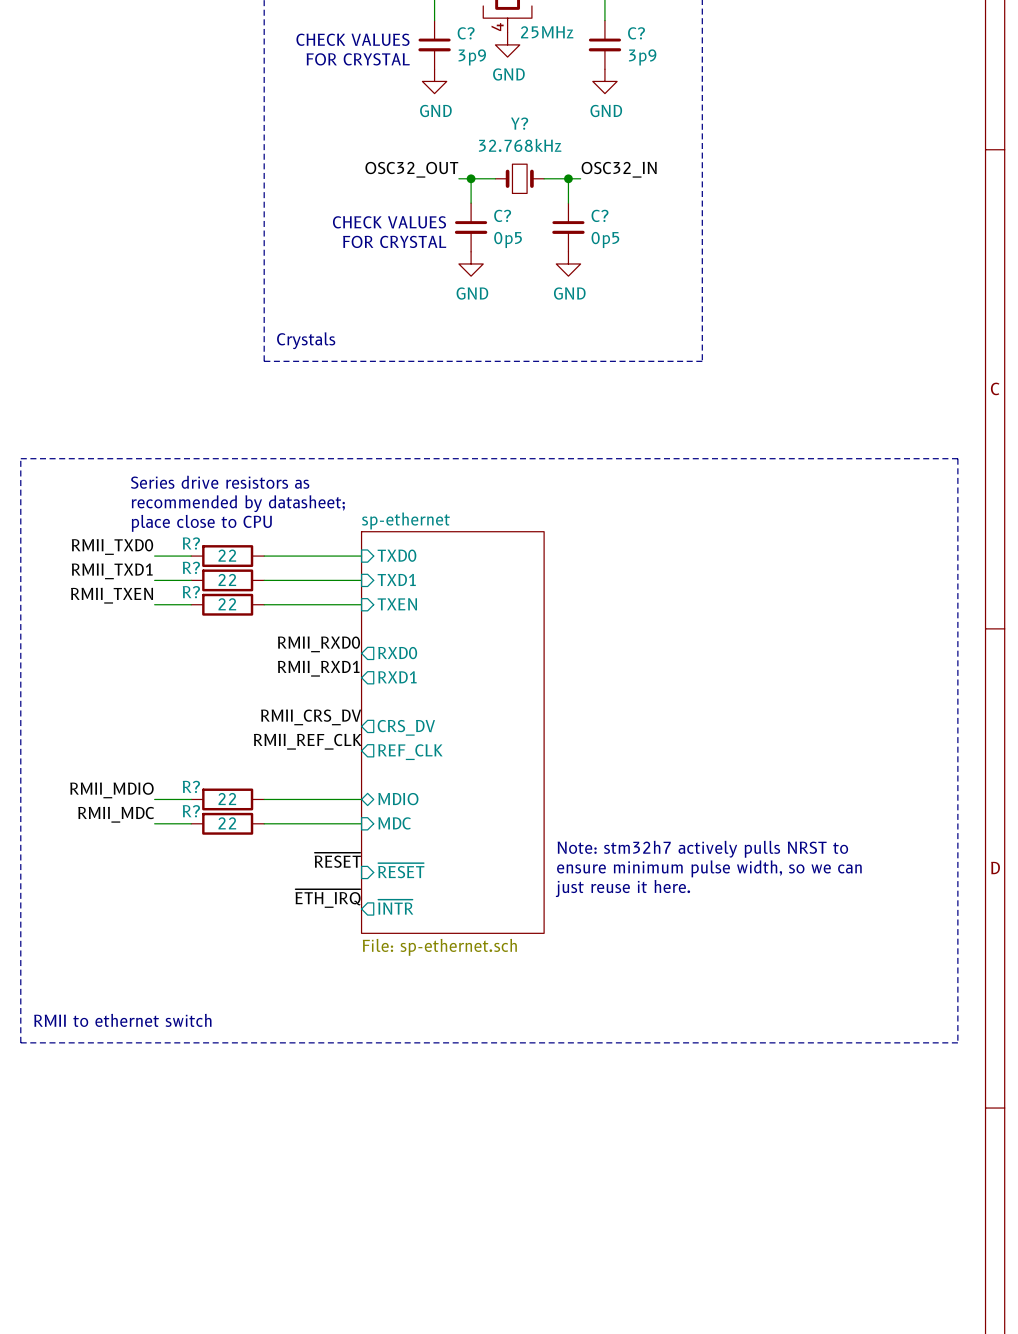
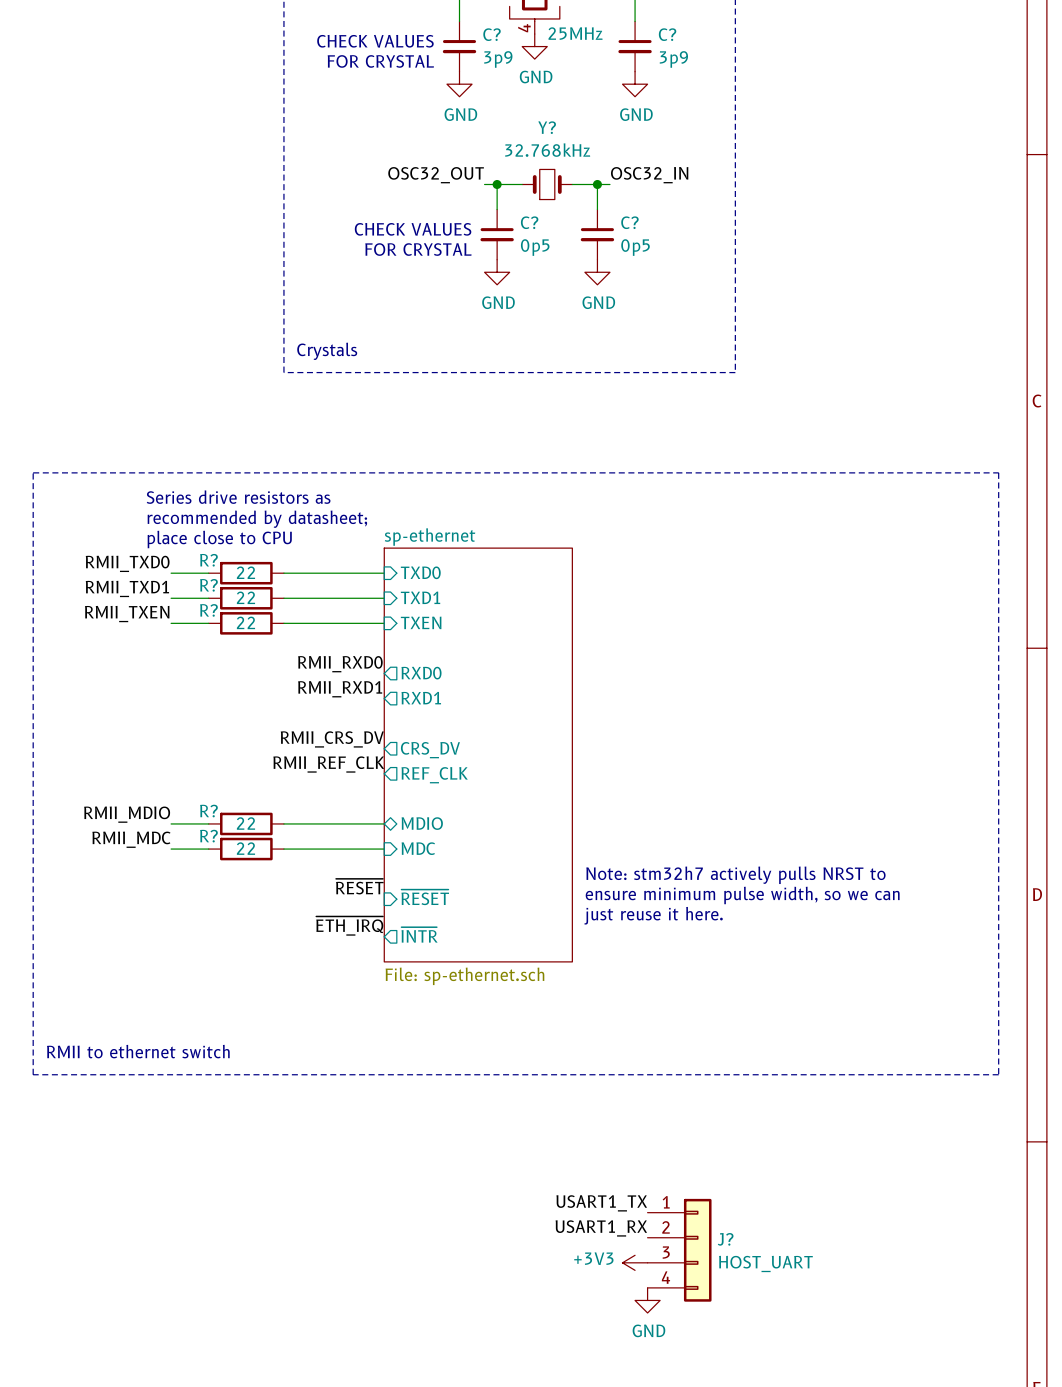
label: none -> USART1_TX (601, 1203)
label: none -> USART1_RX (601, 1228)
J?: none -> HOST_UART (679, 1250)
power symbol: none -> +3V3 (635, 1262)
power symbol: none -> GND (647, 1300)

